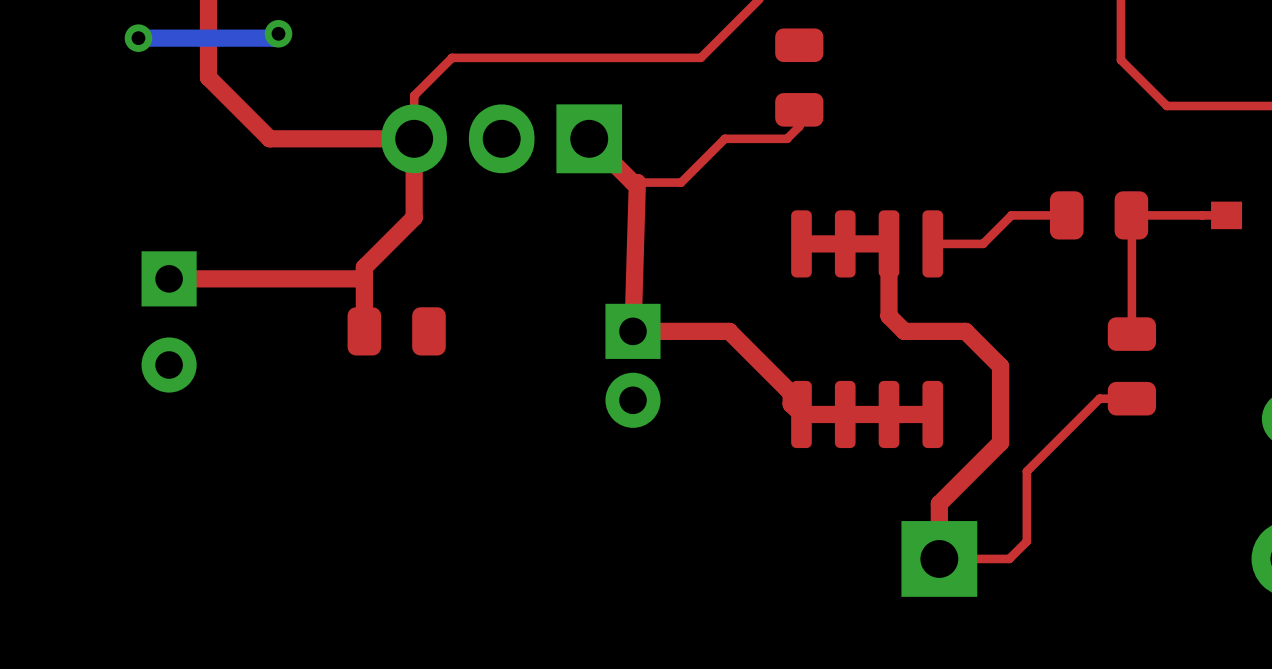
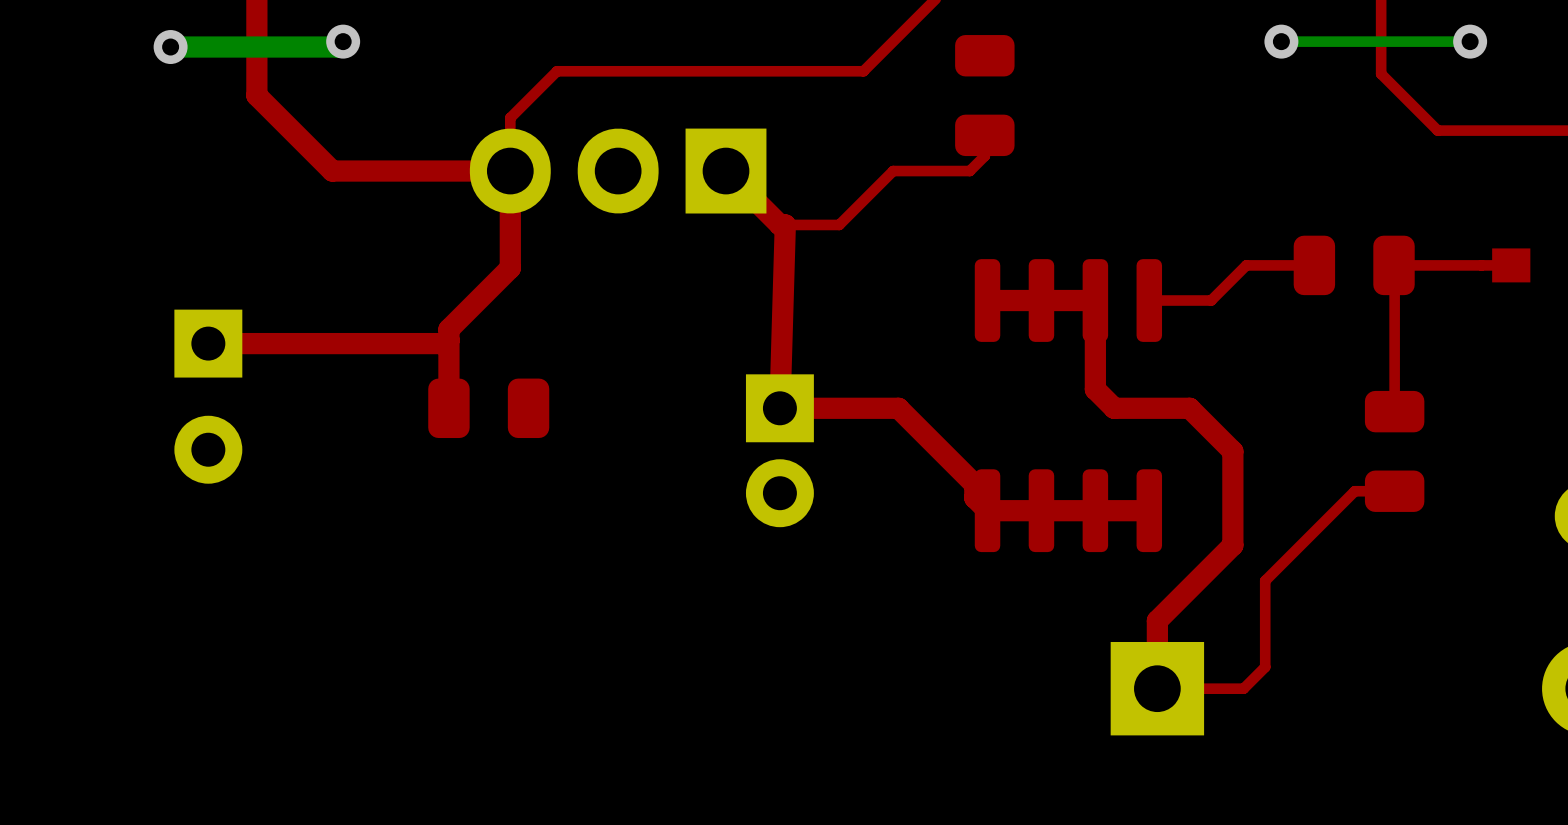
via: none -> (1281, 41)
bottom track: none -> (1470, 41) (1281, 41)
via: none -> (1470, 41)

